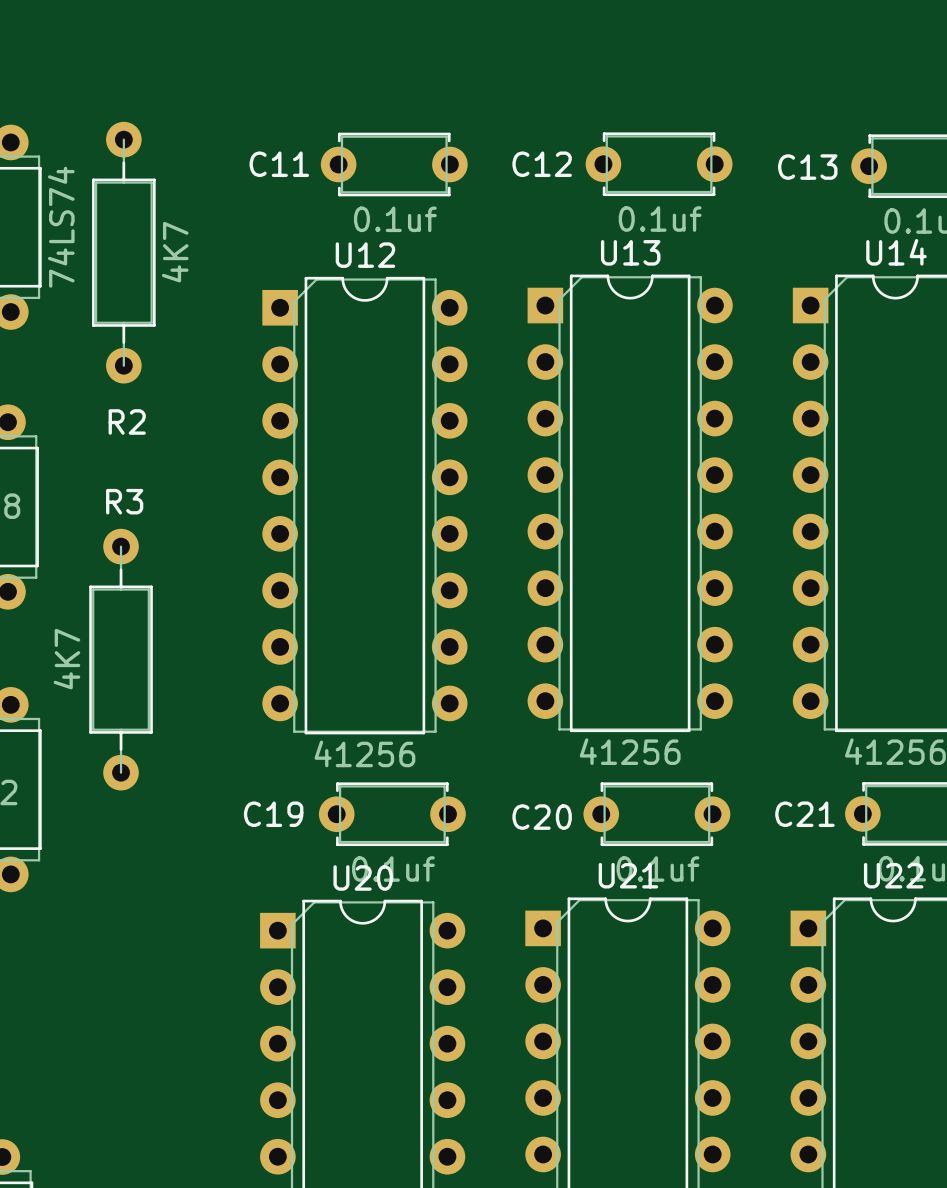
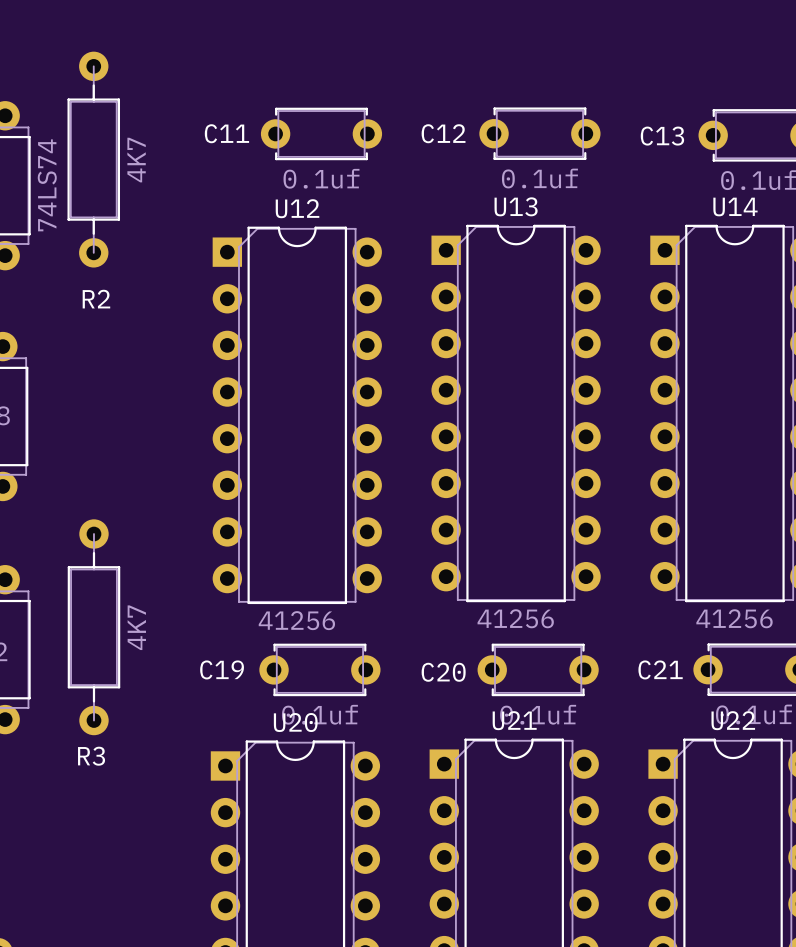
R2 position: (123, 252) -> (93, 159)
R3 name position: R3 (124, 501) -> R3 (91, 756)
R3 value position: 4K7 (66, 659) -> 4K7 (136, 627)
R3 position: (121, 659) -> (93, 627)

